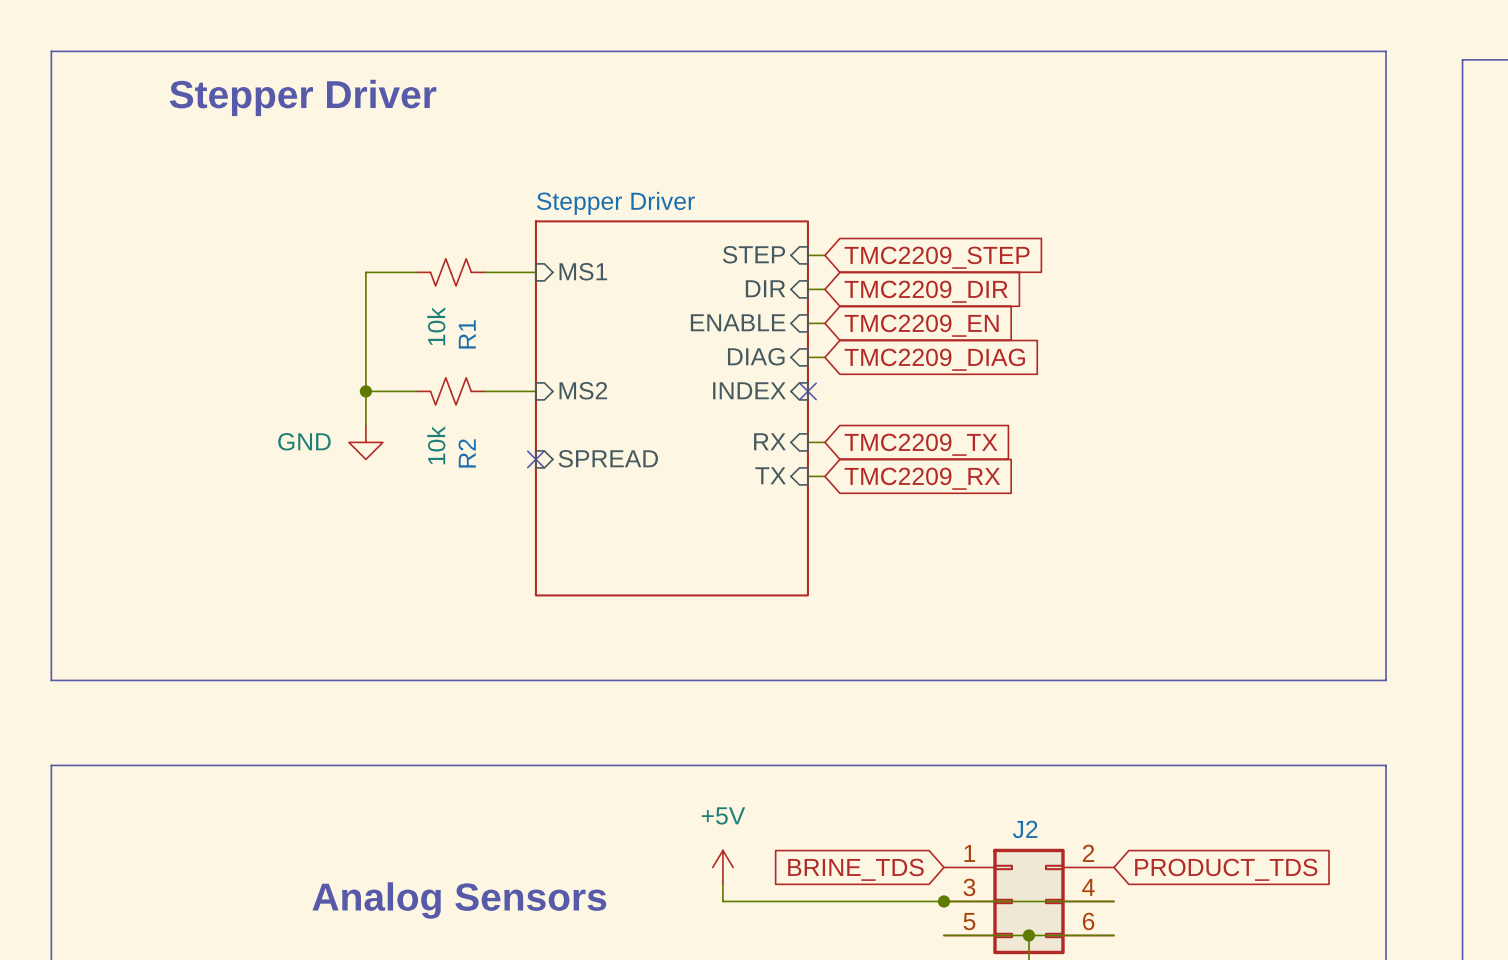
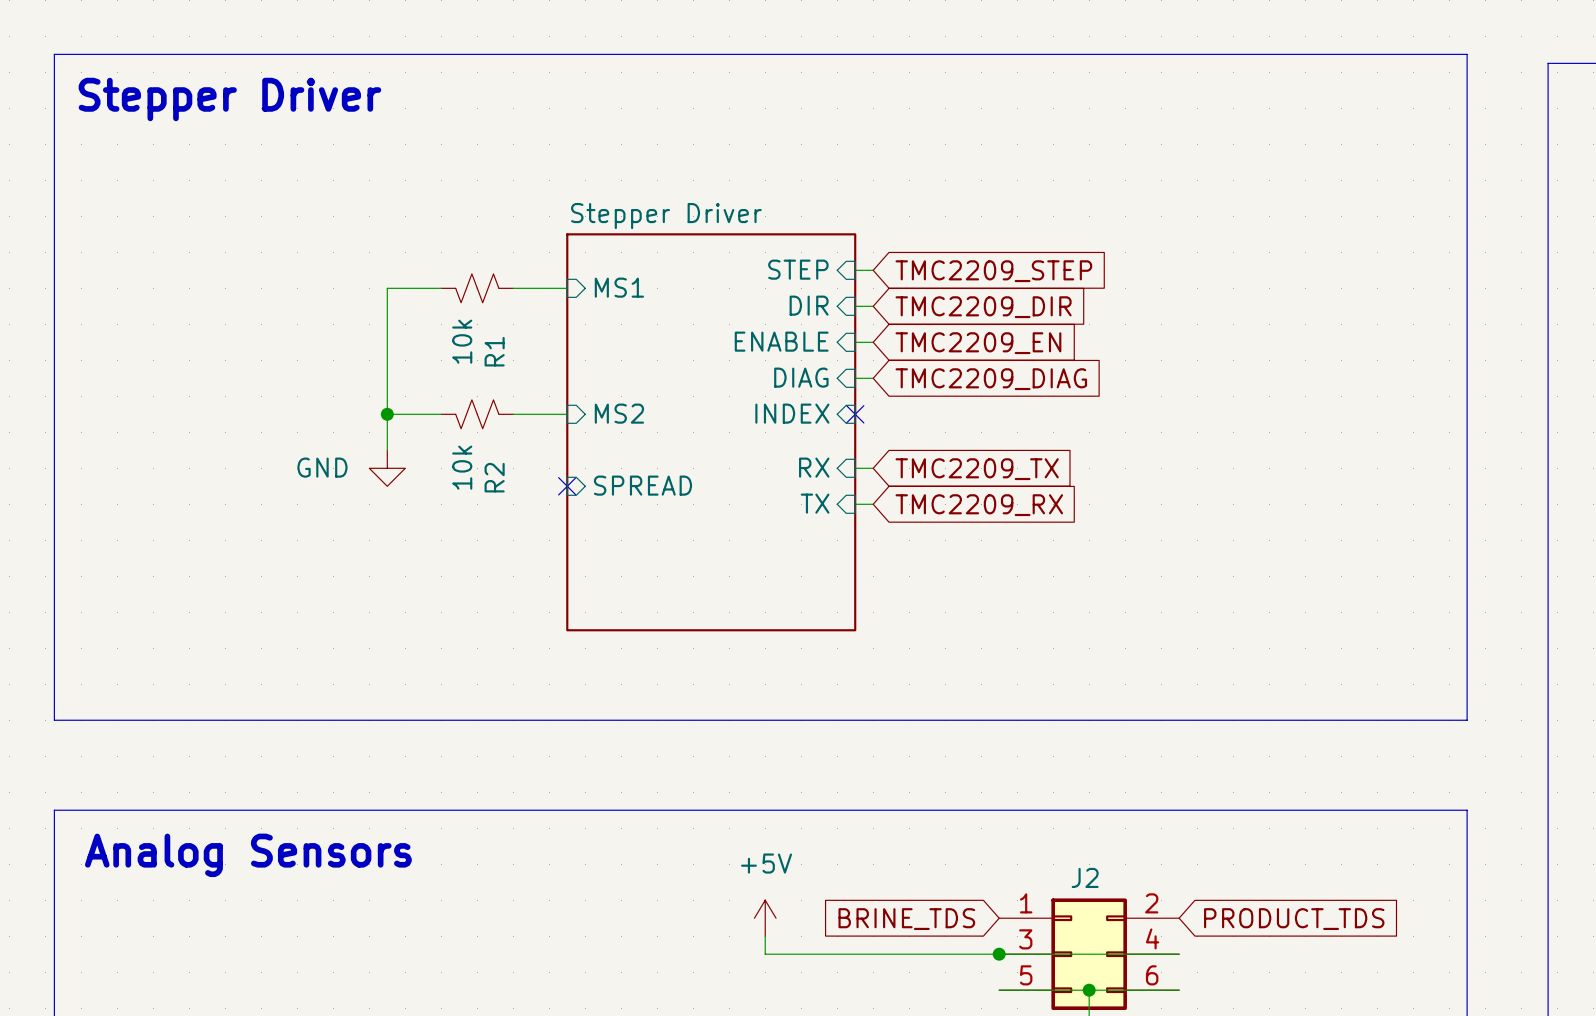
text position: Stepper Driver (303, 97) -> Stepper Driver (229, 99)
text position: Analog Sensors (459, 900) -> Analog Sensors (248, 855)

